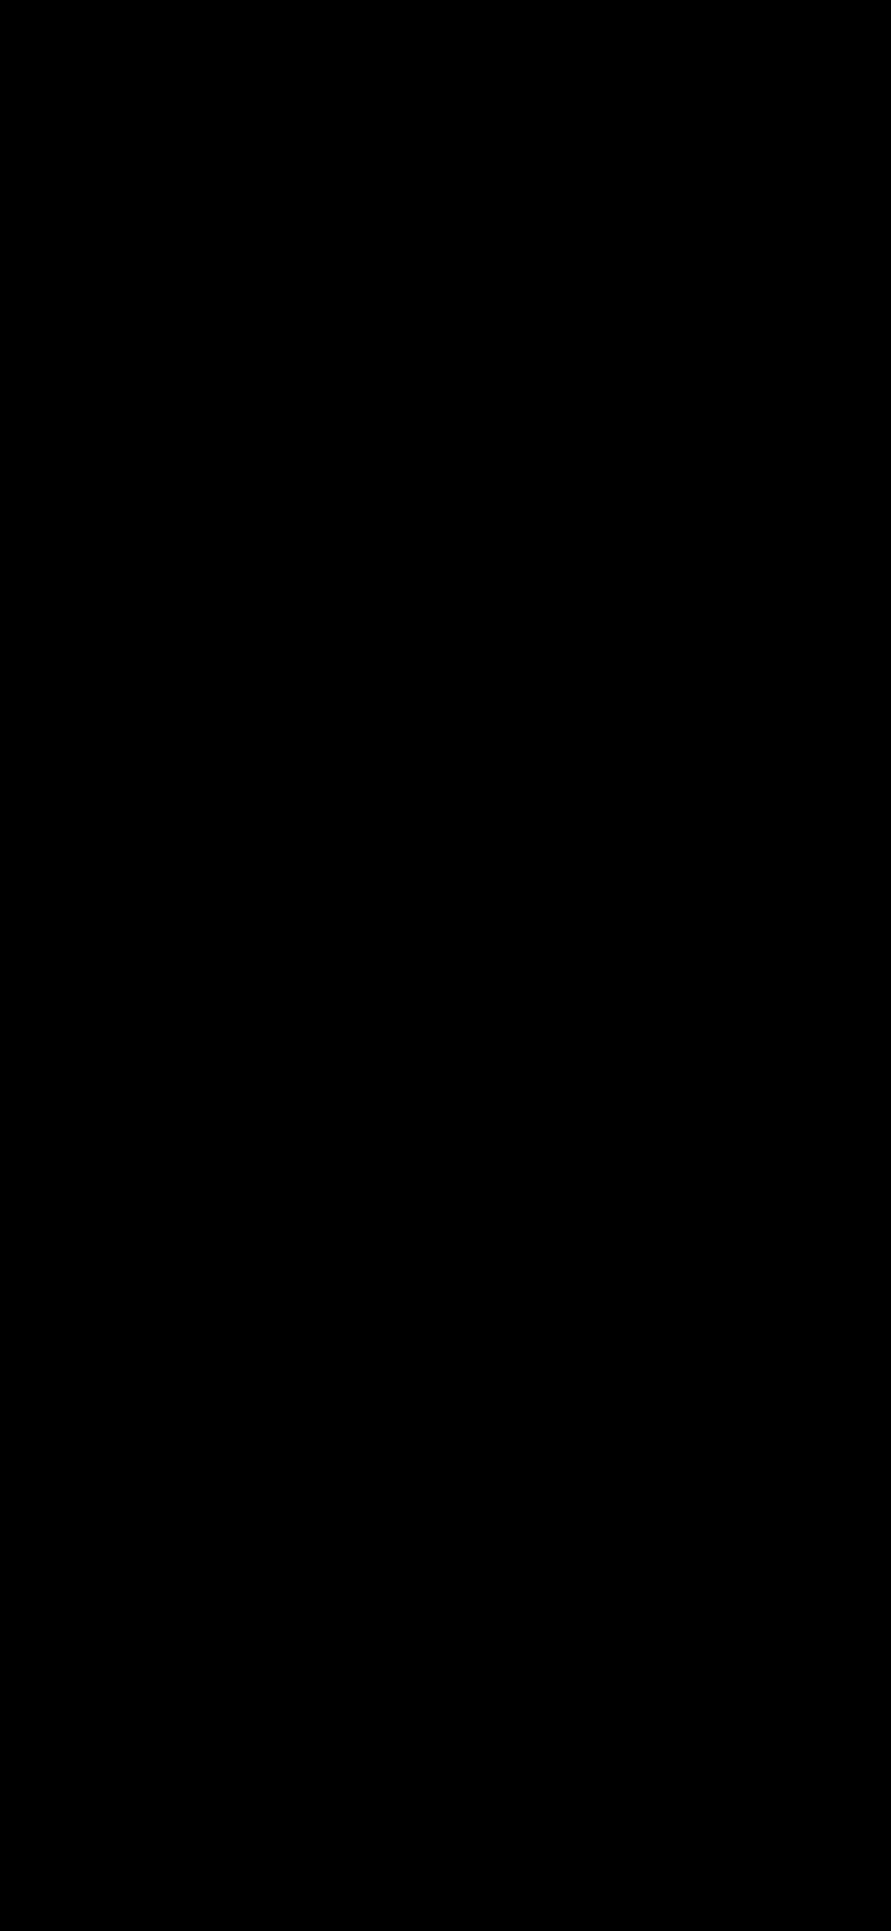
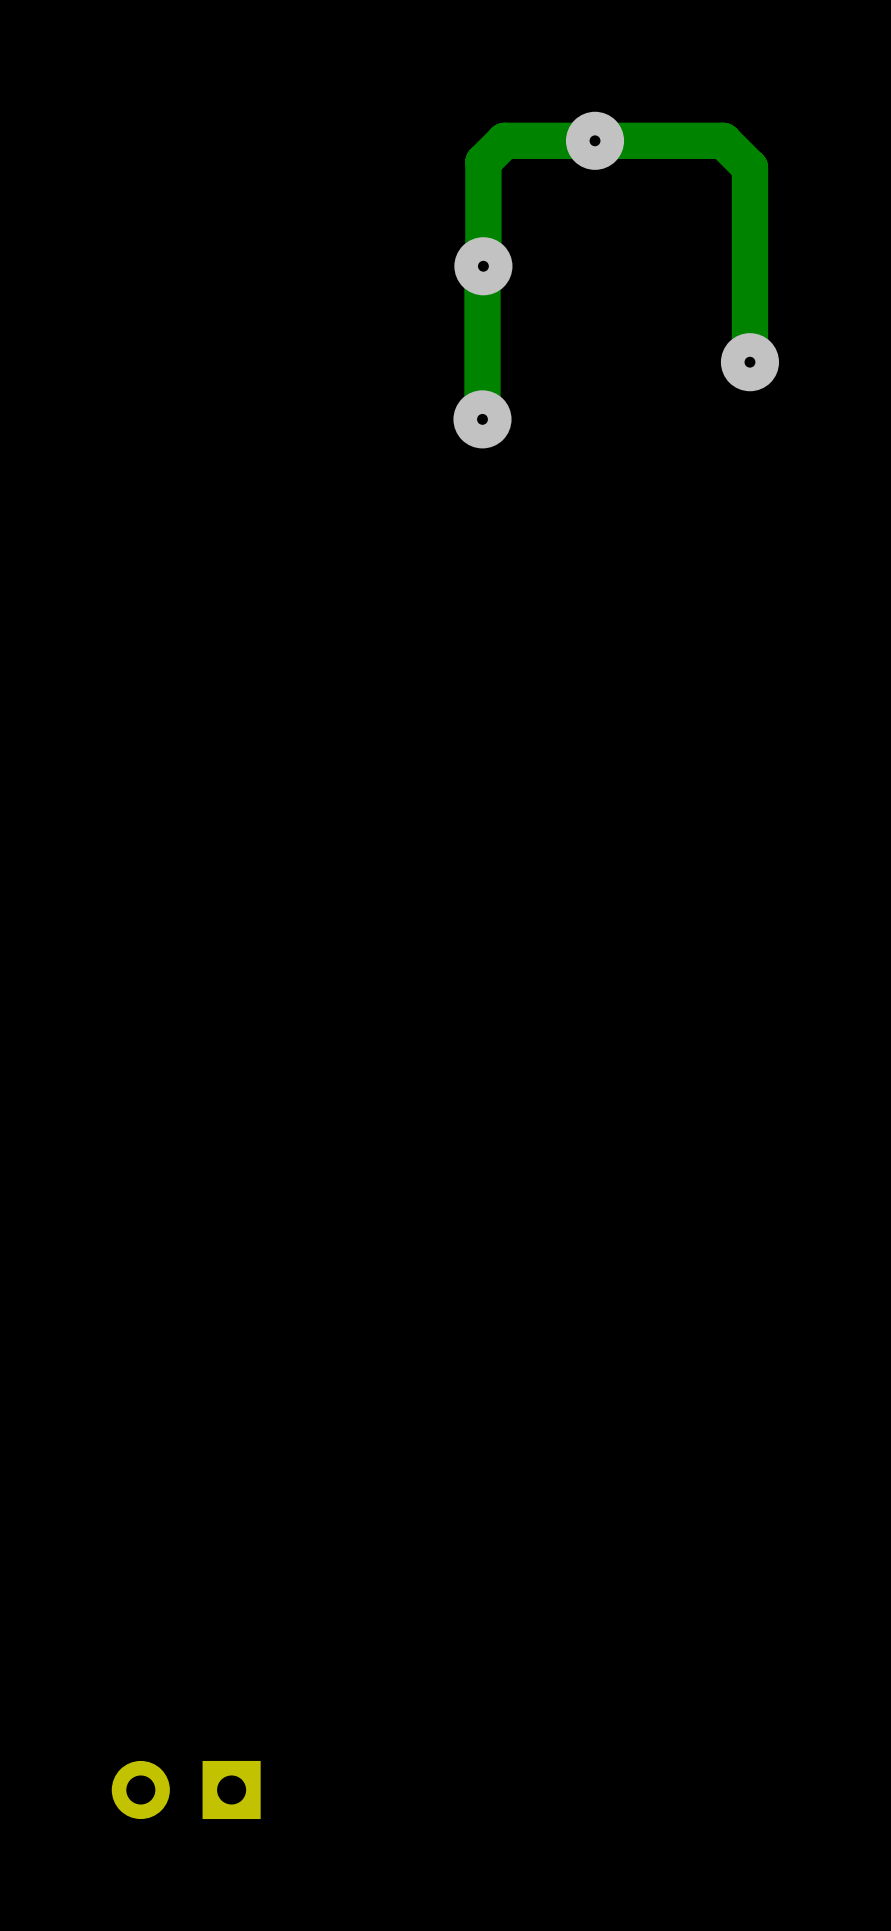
via: none -> (595, 140)
via: none -> (483, 266)
track: none -> (749, 362) (749, 167) (723, 140) (504, 140) (483, 162) (482, 419)
via: none -> (749, 362)
via: none -> (482, 419)
part: none -> (186, 1789)

